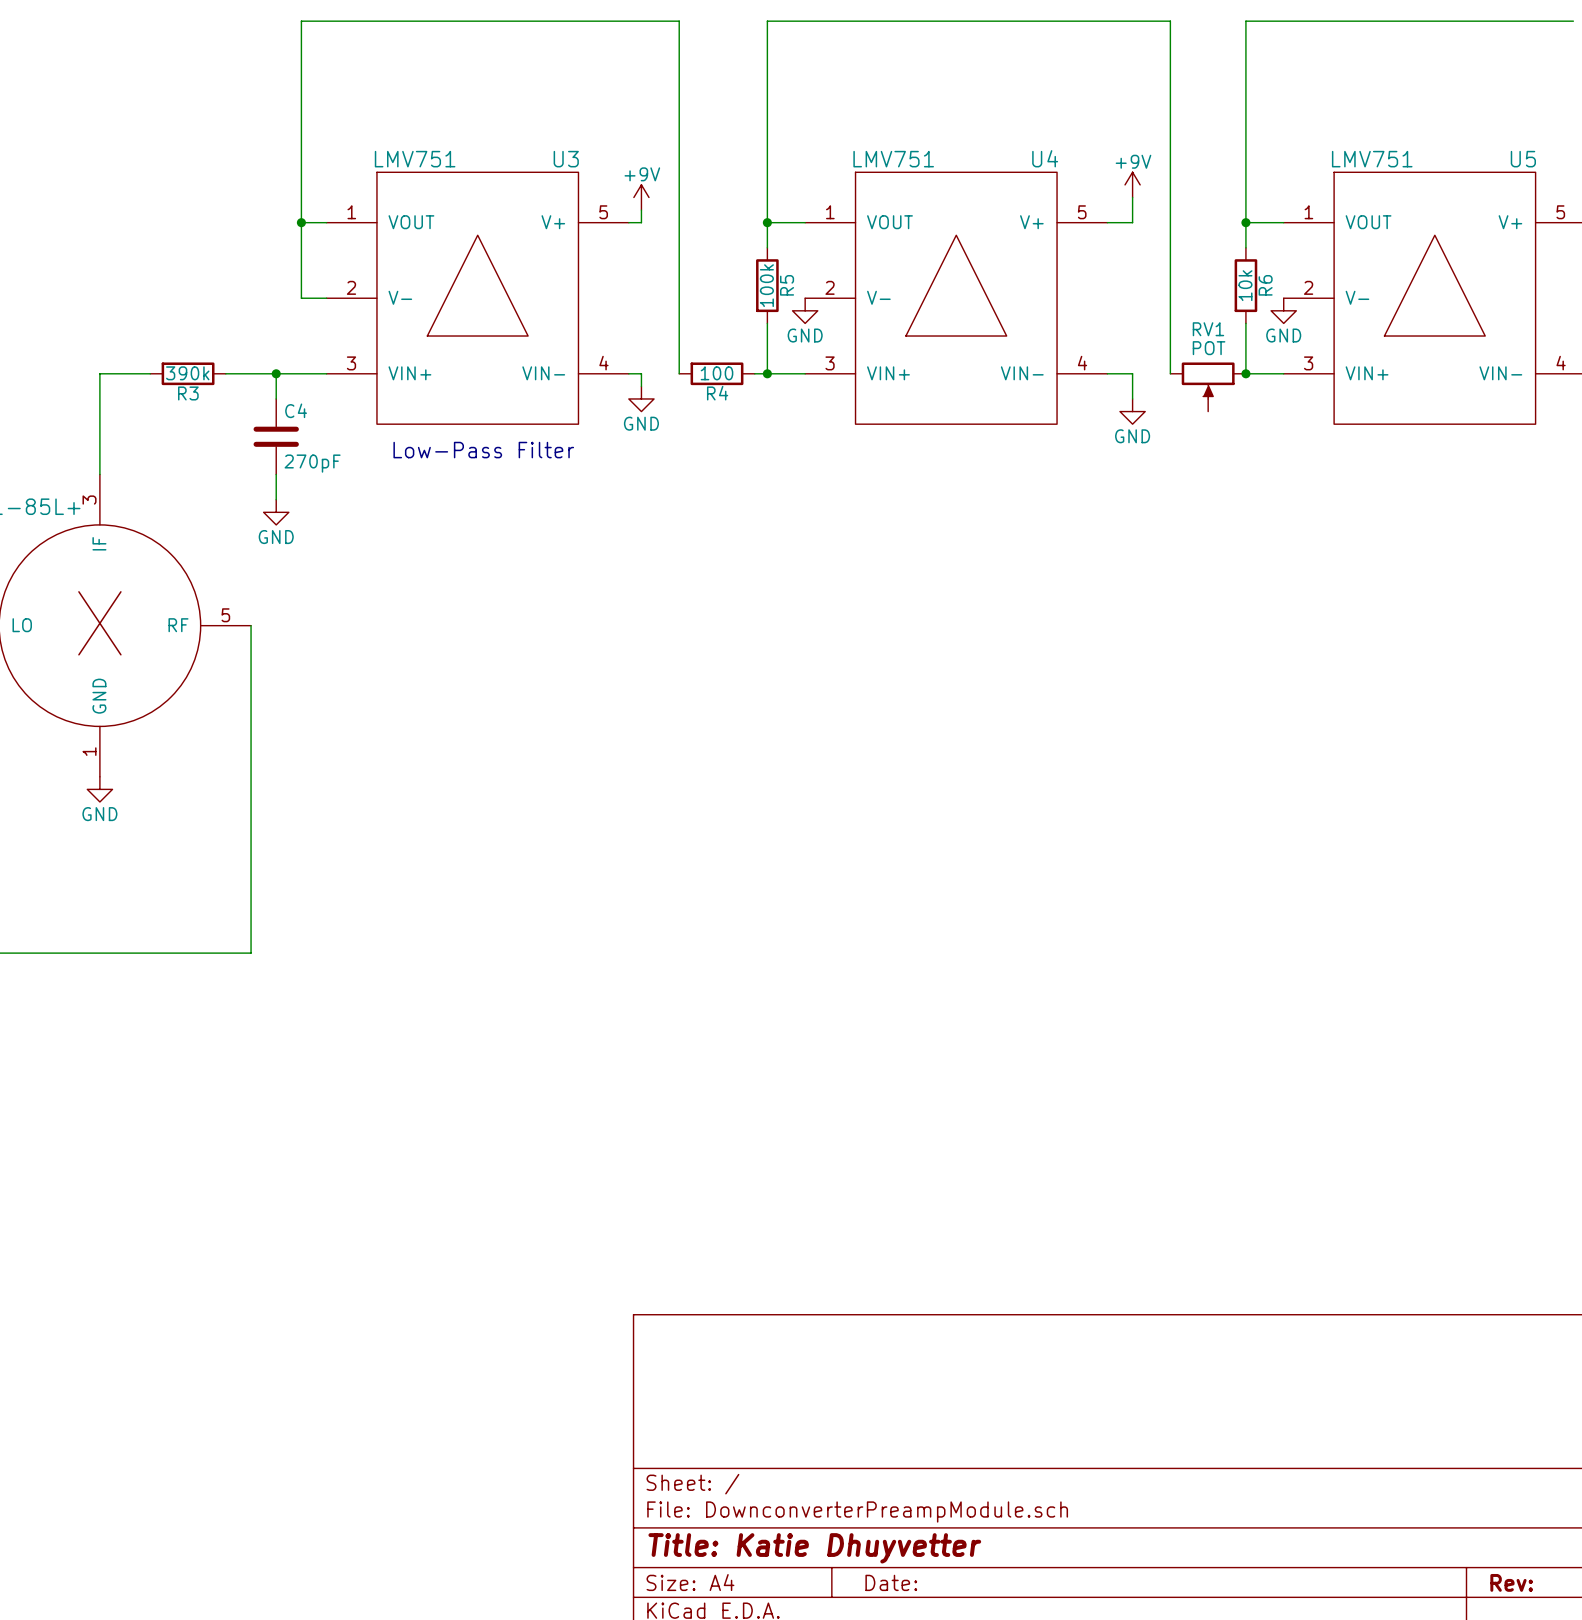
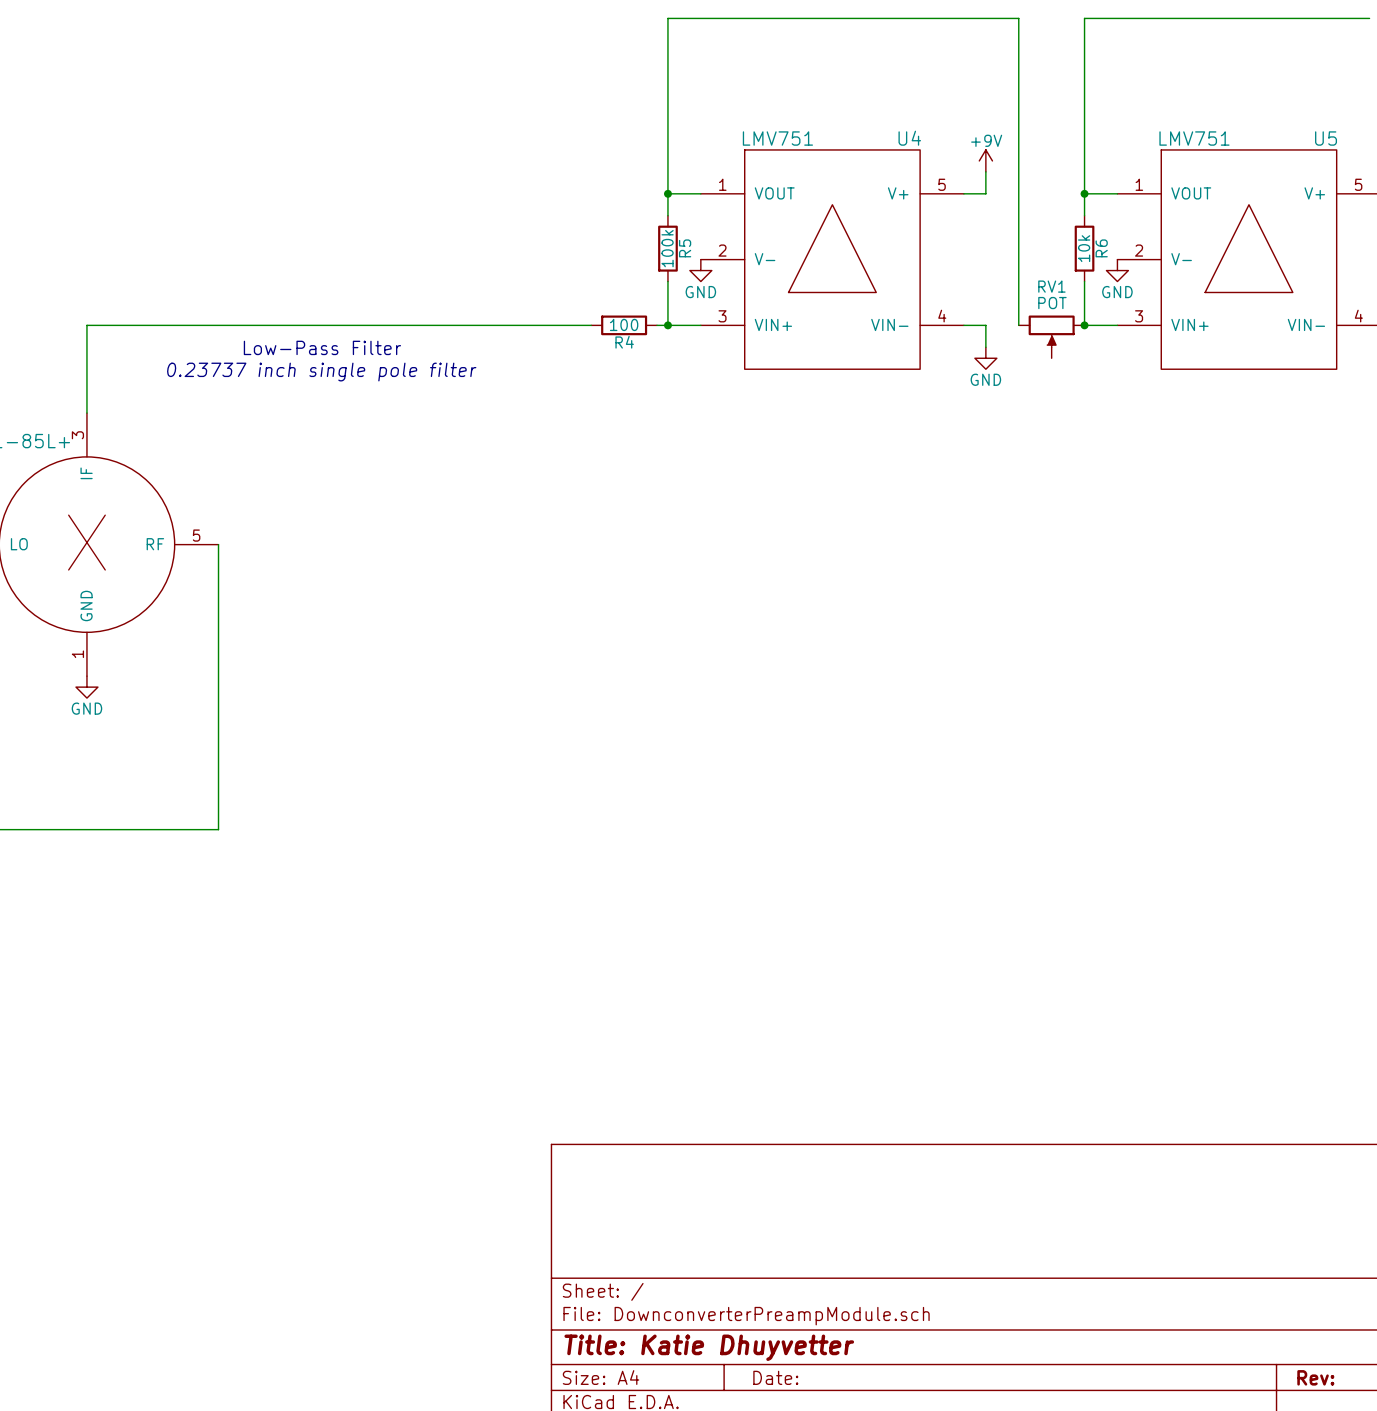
power symbol: +9V (641, 197) -> none
wire: (641, 210) (641, 222) (628, 222) -> none
wire: (301, 222) (326, 222) -> none
junction: (301, 222) -> none
wire: (326, 298) (301, 298) (301, 21) (679, 21) (679, 373) -> none
U3: LMV751 (477, 298) -> none
R3: 390k (188, 373) -> none
wire: (276, 373) (276, 398) -> none
junction: (276, 373) -> none
wire: none -> (284, 325) (547, 325)
wire: (641, 373) (641, 386) -> (558, 325) (591, 325)
power symbol: GND (641, 398) -> none
text: none -> 0.23737 inch single pole filter (321, 372)
C4: 270pF (276, 436) -> none
text position: Low-Pass Filter (483, 450) -> Low-Pass Filter (322, 347)
wire: (276, 474) (276, 499) -> none
power symbol: GND (276, 512) -> none

